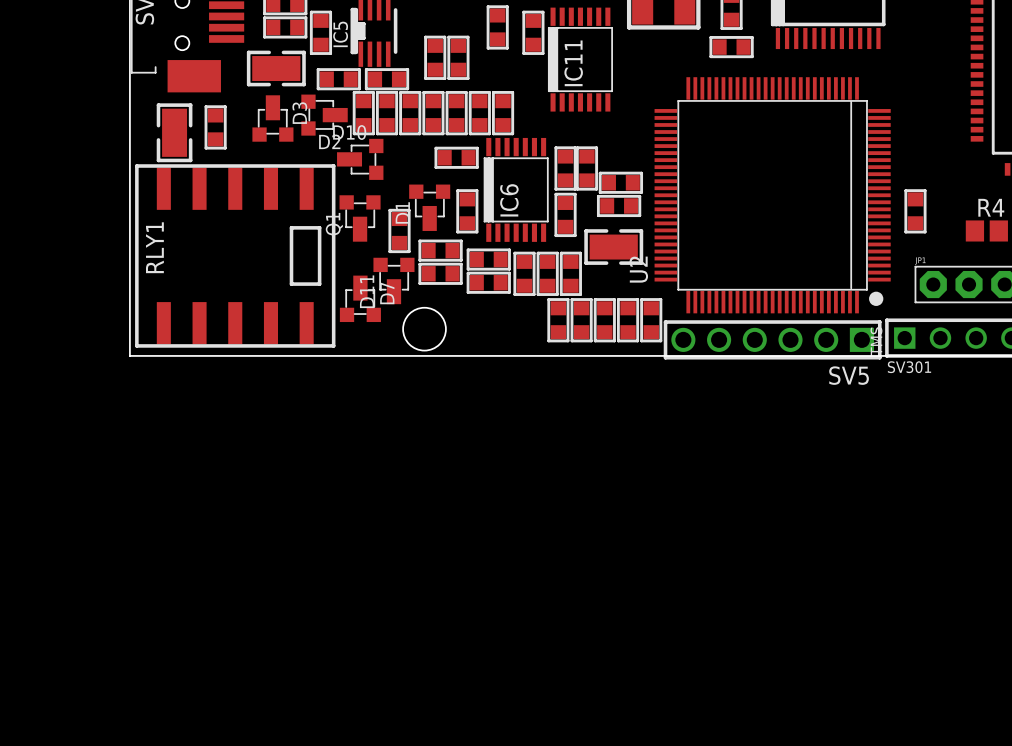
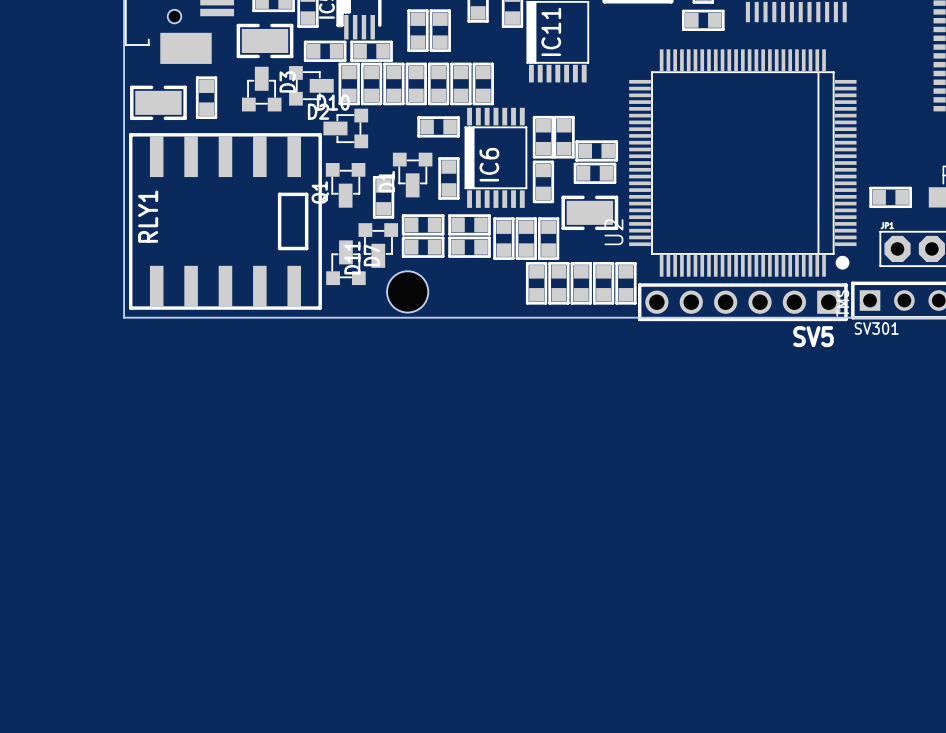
part rotation: 0° (174, 132) -> 90° clockwise (158, 102)
part rotation: 0° (915, 211) -> 90° clockwise (890, 197)
part: (440, 250) -> none
part: none -> (423, 224)
part: (440, 273) -> none
part: none -> (423, 247)

